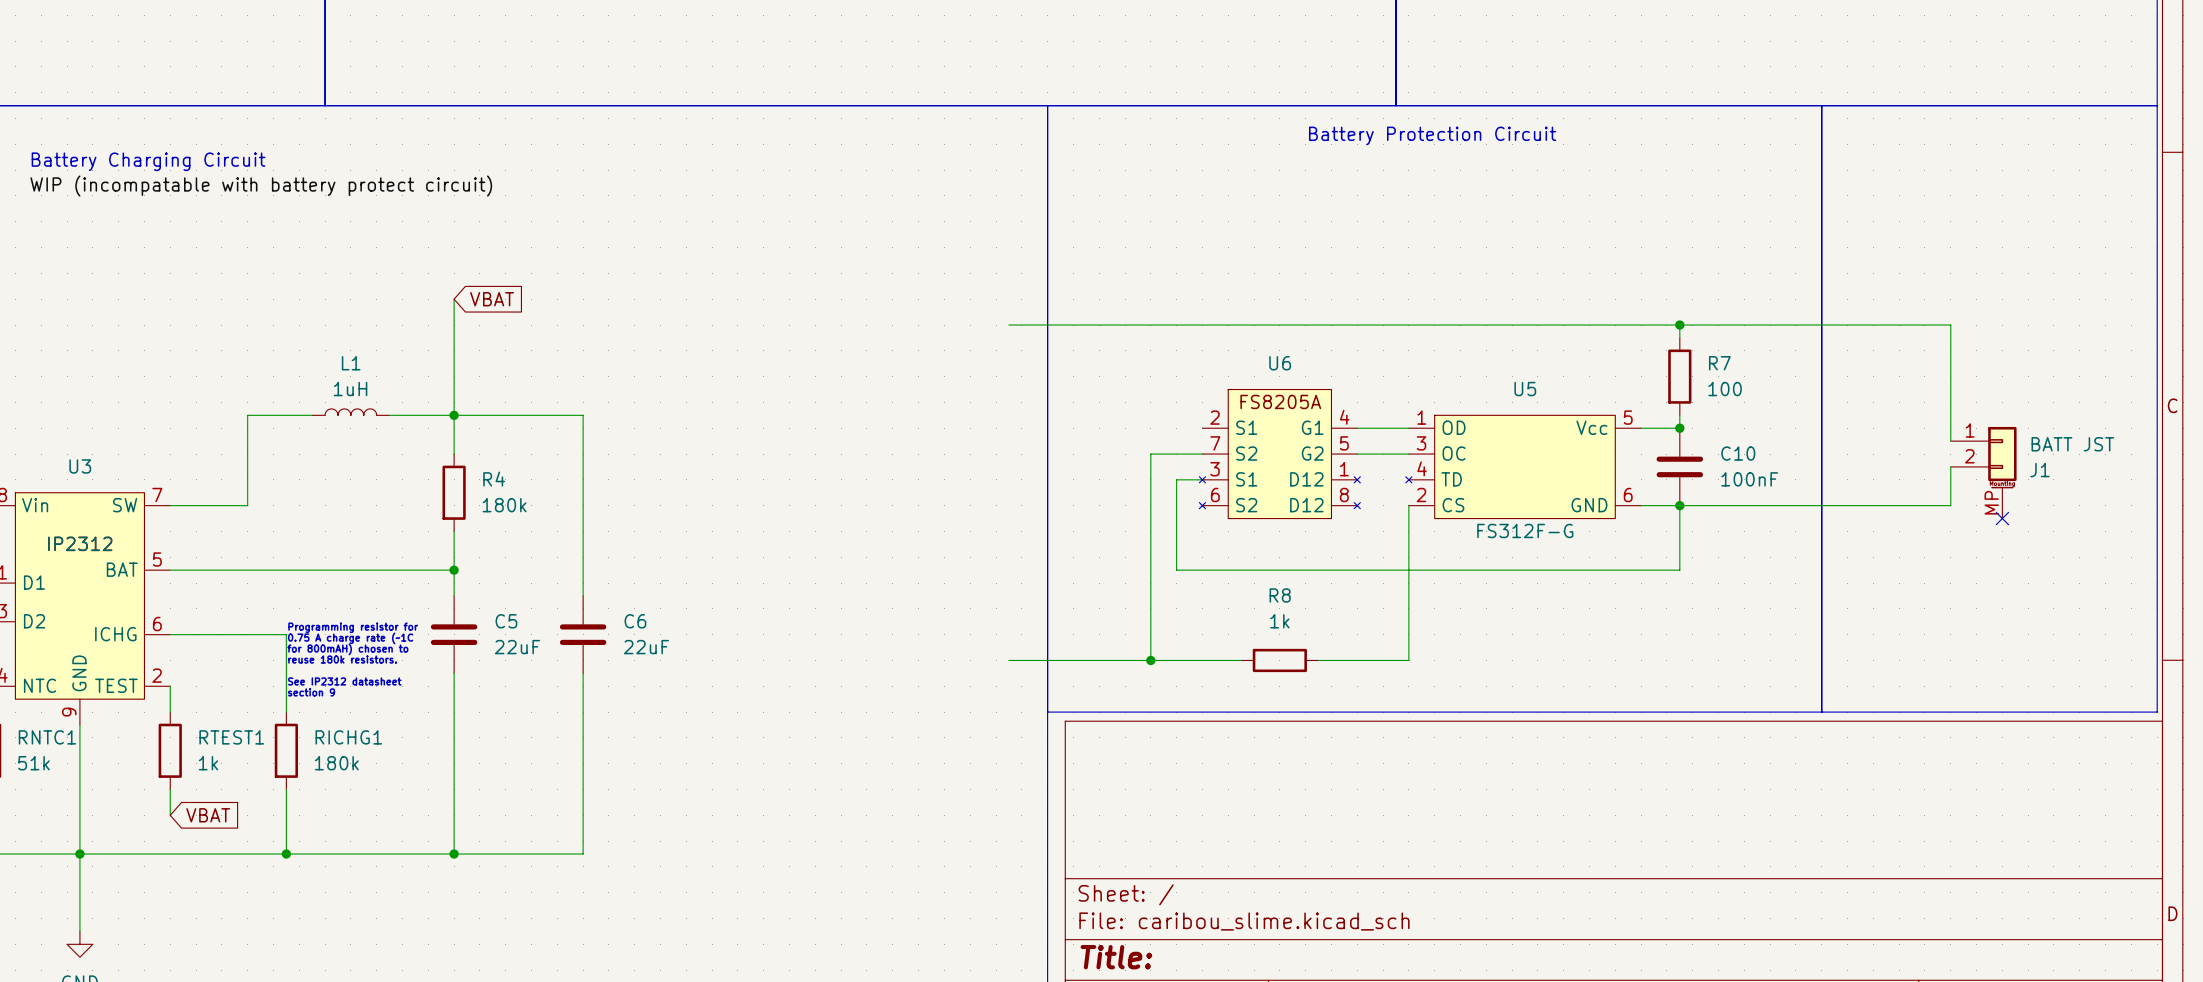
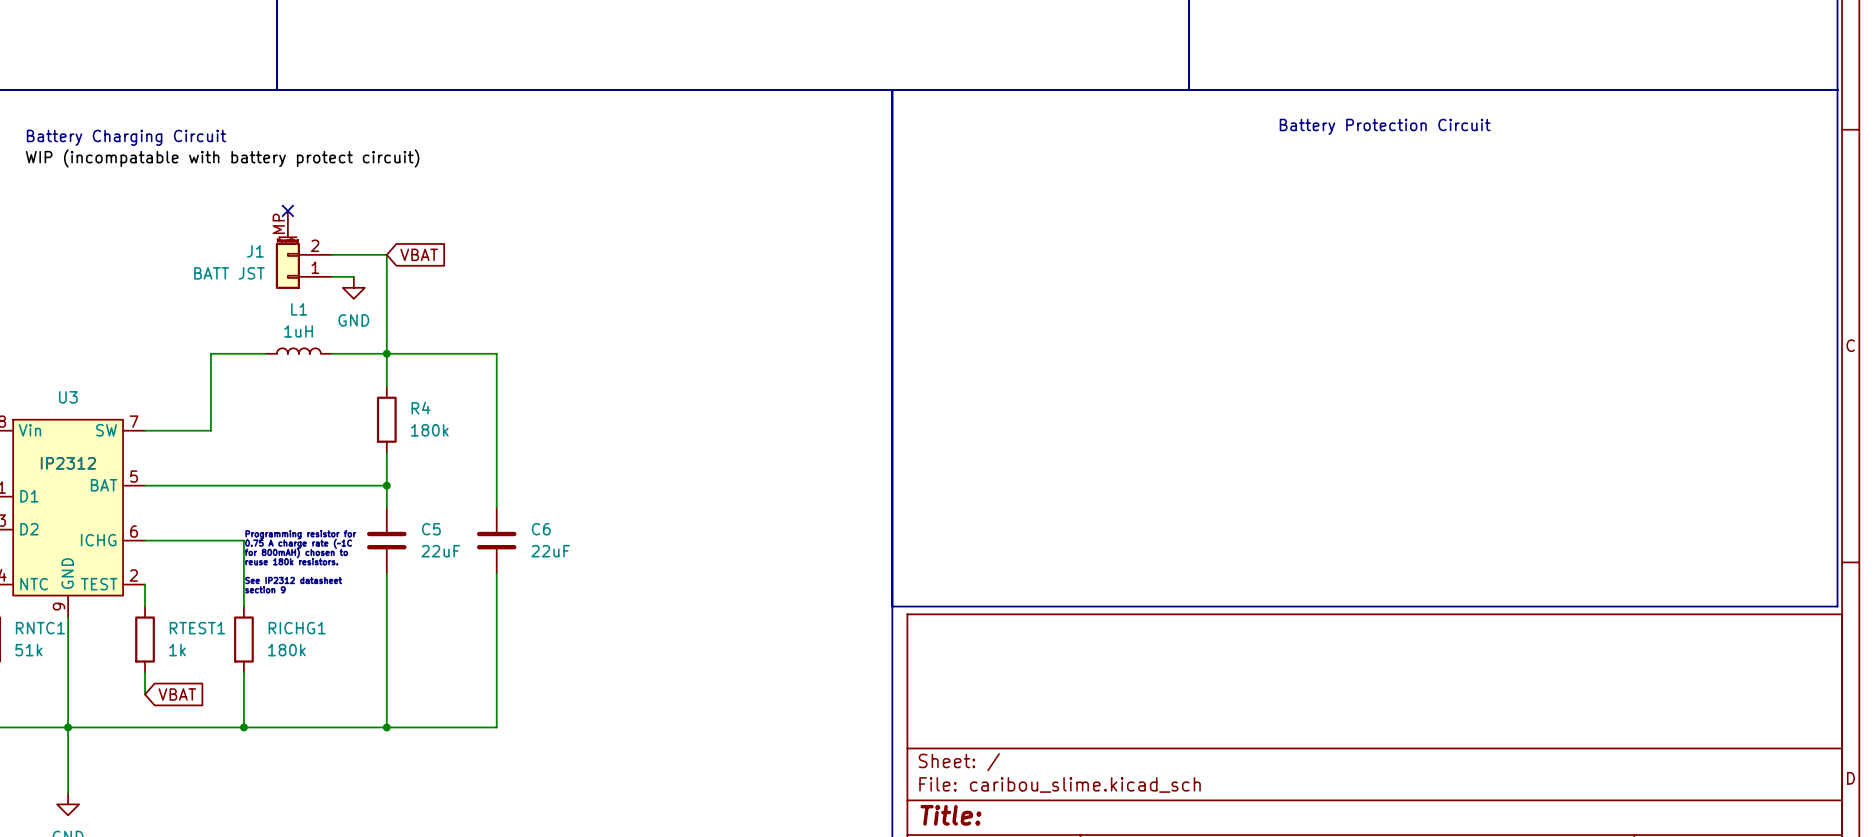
line: (1821, 105) (1821, 712) -> none
text position: Battery Protection Circuit (1432, 135) -> Battery Protection Circuit (1385, 126)
no-connect mark: none -> (287, 210)
wire: none -> (331, 254) (386, 254)
wire: none -> (331, 276) (353, 276)
wire: (1008, 325) (1950, 325) (1950, 441) -> none
wire: (1679, 325) (1679, 337) -> none
junction: (1679, 325) -> none
power symbol: none -> GND (353, 287)
R7: 100 (1679, 376) -> none
wire: (1679, 415) (1679, 428) (1641, 428) -> none
wire: (1357, 428) (1408, 428) -> none
junction: (1679, 428) -> none
wire: (1202, 454) (1150, 454) (1150, 660) -> none
U6: (1279, 454) -> none
wire: (1357, 454) (1408, 454) -> none
J1 rotation: 0° (2002, 457) -> 180° (287, 262)
U5: FS312F-G (1523, 466) -> none
C10: 100nF (1679, 466) -> none
wire: (1950, 466) (1950, 505) (1641, 505) -> none
J1 position: (1983, 472) -> (303, 249)
wire: (1202, 479) (1176, 479) (1176, 570) (1679, 570) (1679, 505) -> none
wire: (1408, 505) (1408, 660) (1318, 660) -> none
junction: (1679, 505) -> none
no-connect mark: (2002, 518) -> none
wire: (1008, 660) (1241, 660) -> none
junction: (1150, 660) -> none
R8: 1k (1279, 660) -> none

